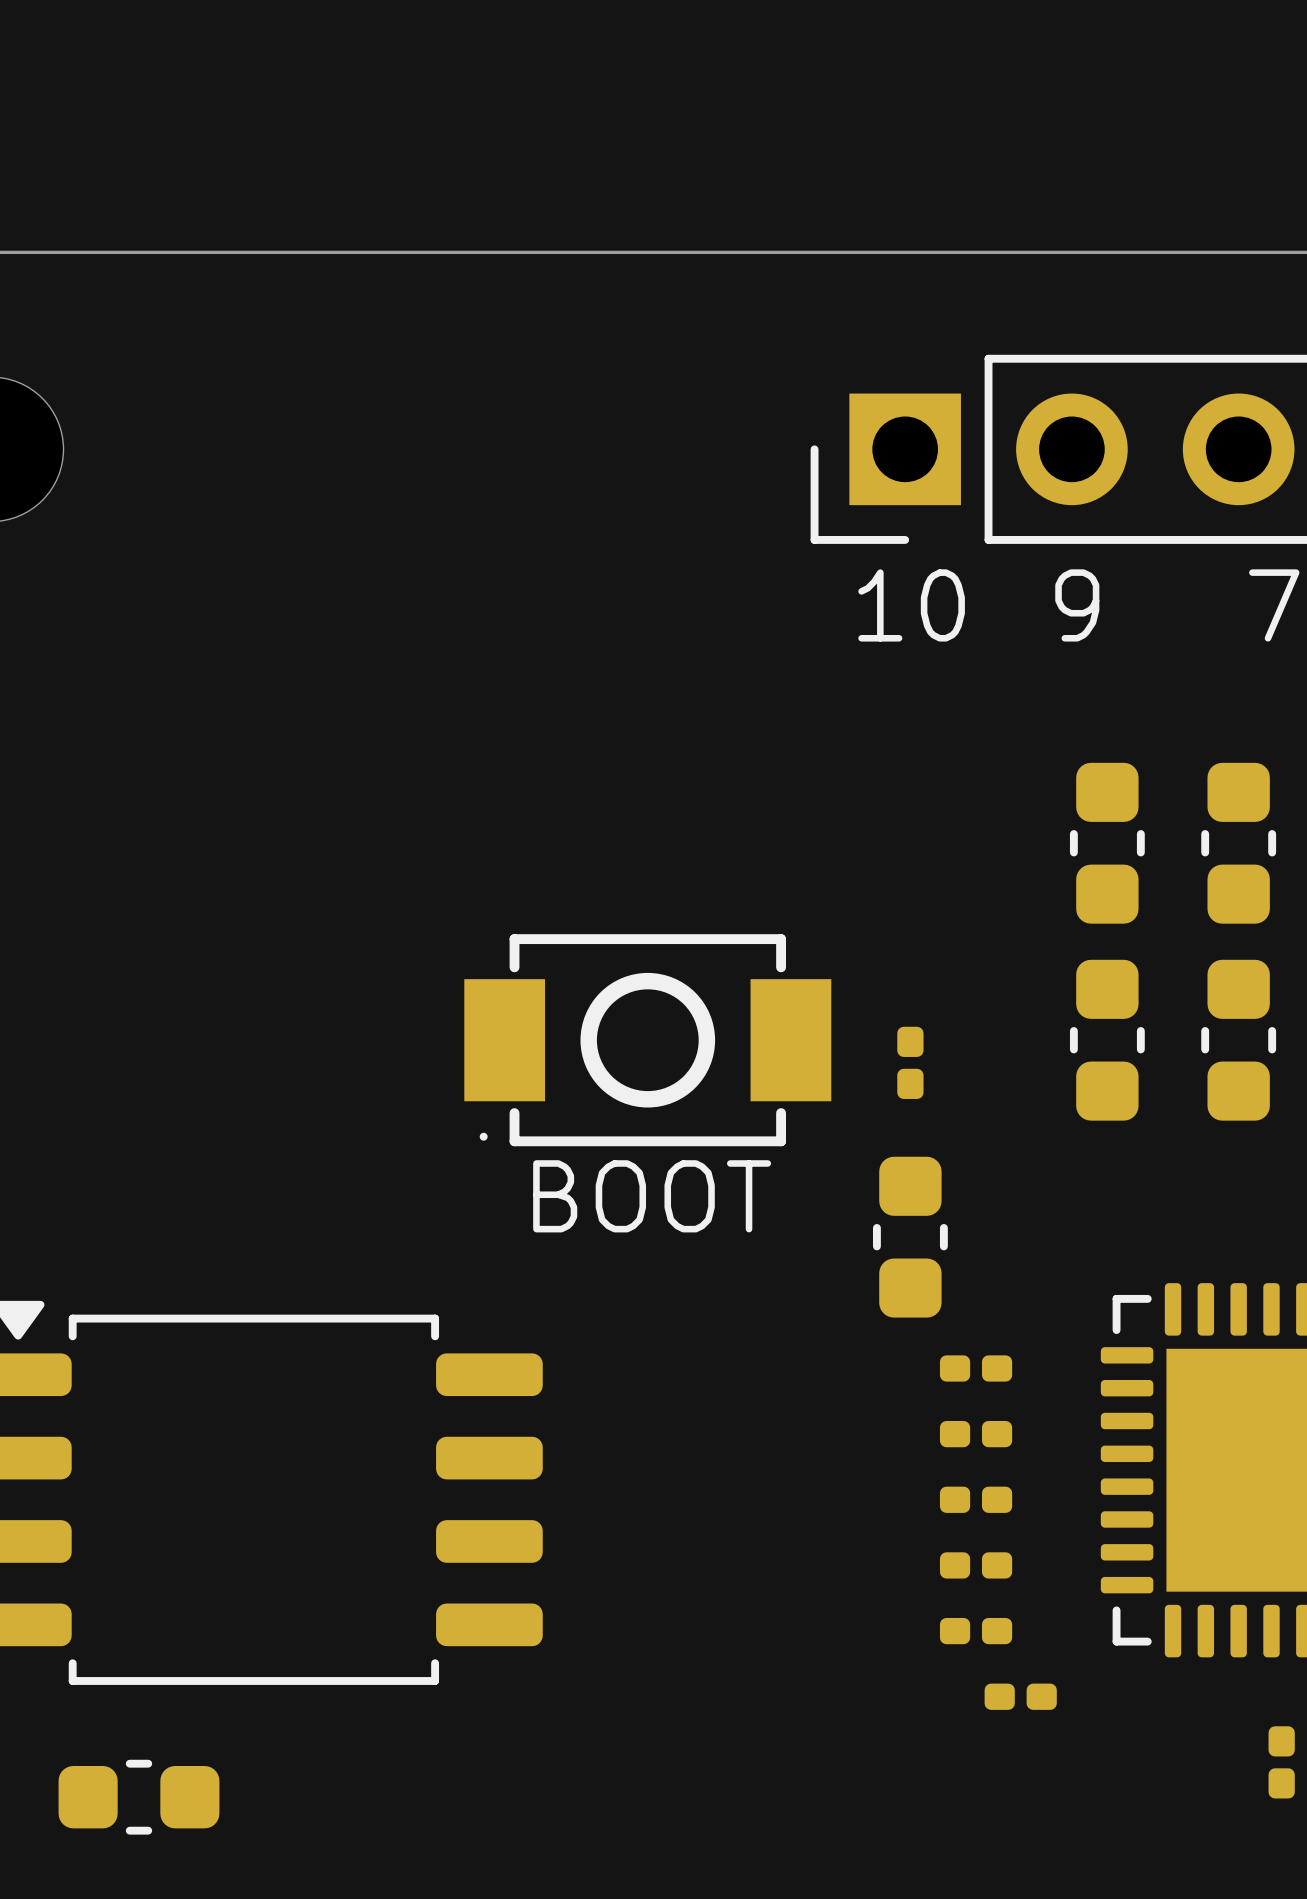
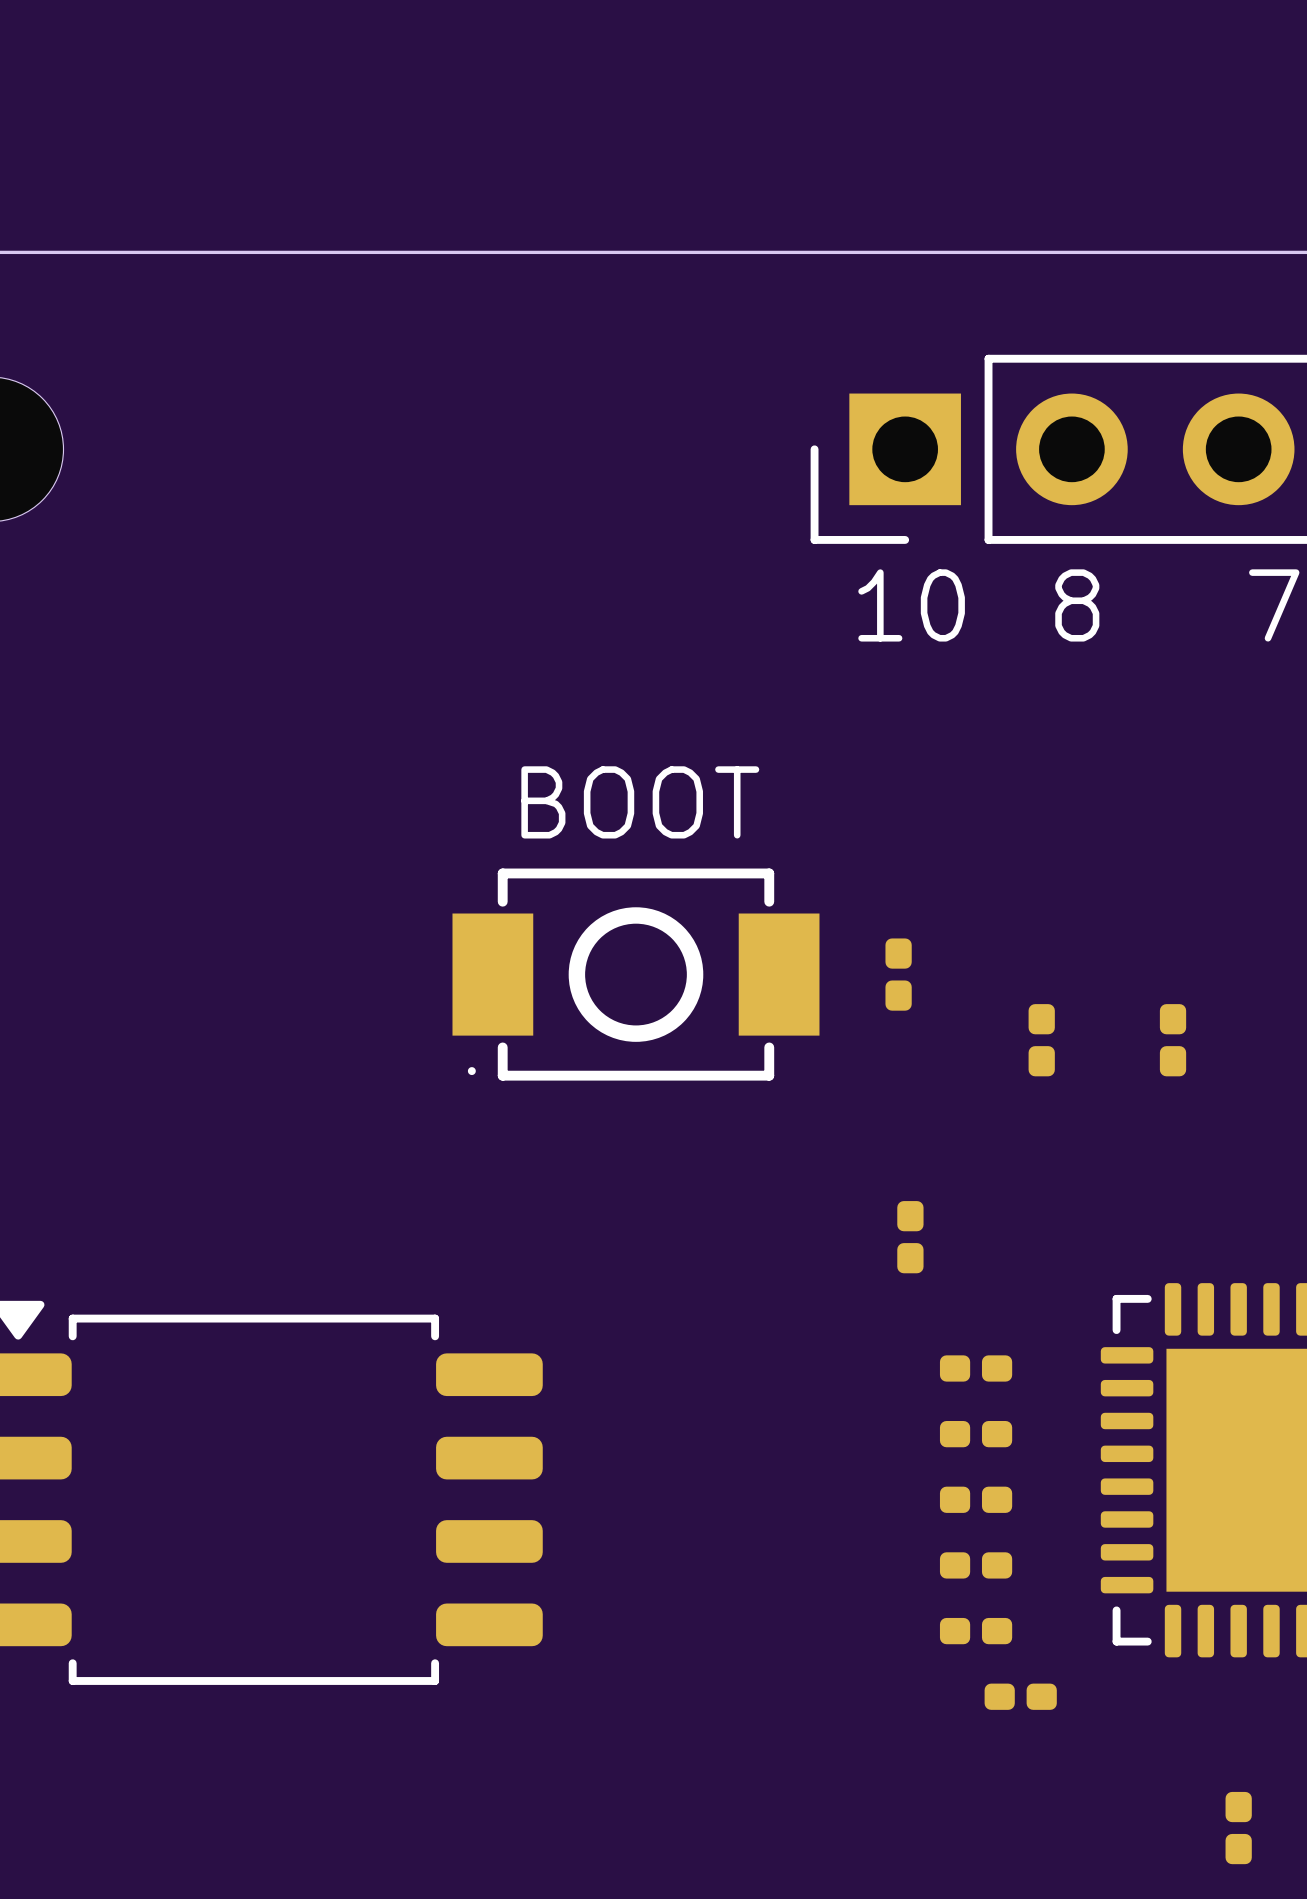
text: 9 (1077, 605) -> 8 (1077, 605)
part: (1107, 843) -> none
part: (1238, 843) -> none
part: none -> (898, 974)
part position: (647, 1040) -> (635, 974)
part: none -> (1041, 1040)
part: (1107, 1040) -> none
part: none -> (1173, 1040)
part: (1238, 1040) -> none
part: (910, 1062) -> none
part footprint: [872, 1156, 948, 1318] -> [897, 1201, 924, 1274]
text position: BOOT (652, 1196) -> BOOT (640, 802)
part position: (1281, 1762) -> (1238, 1828)
part: (138, 1797) -> none

